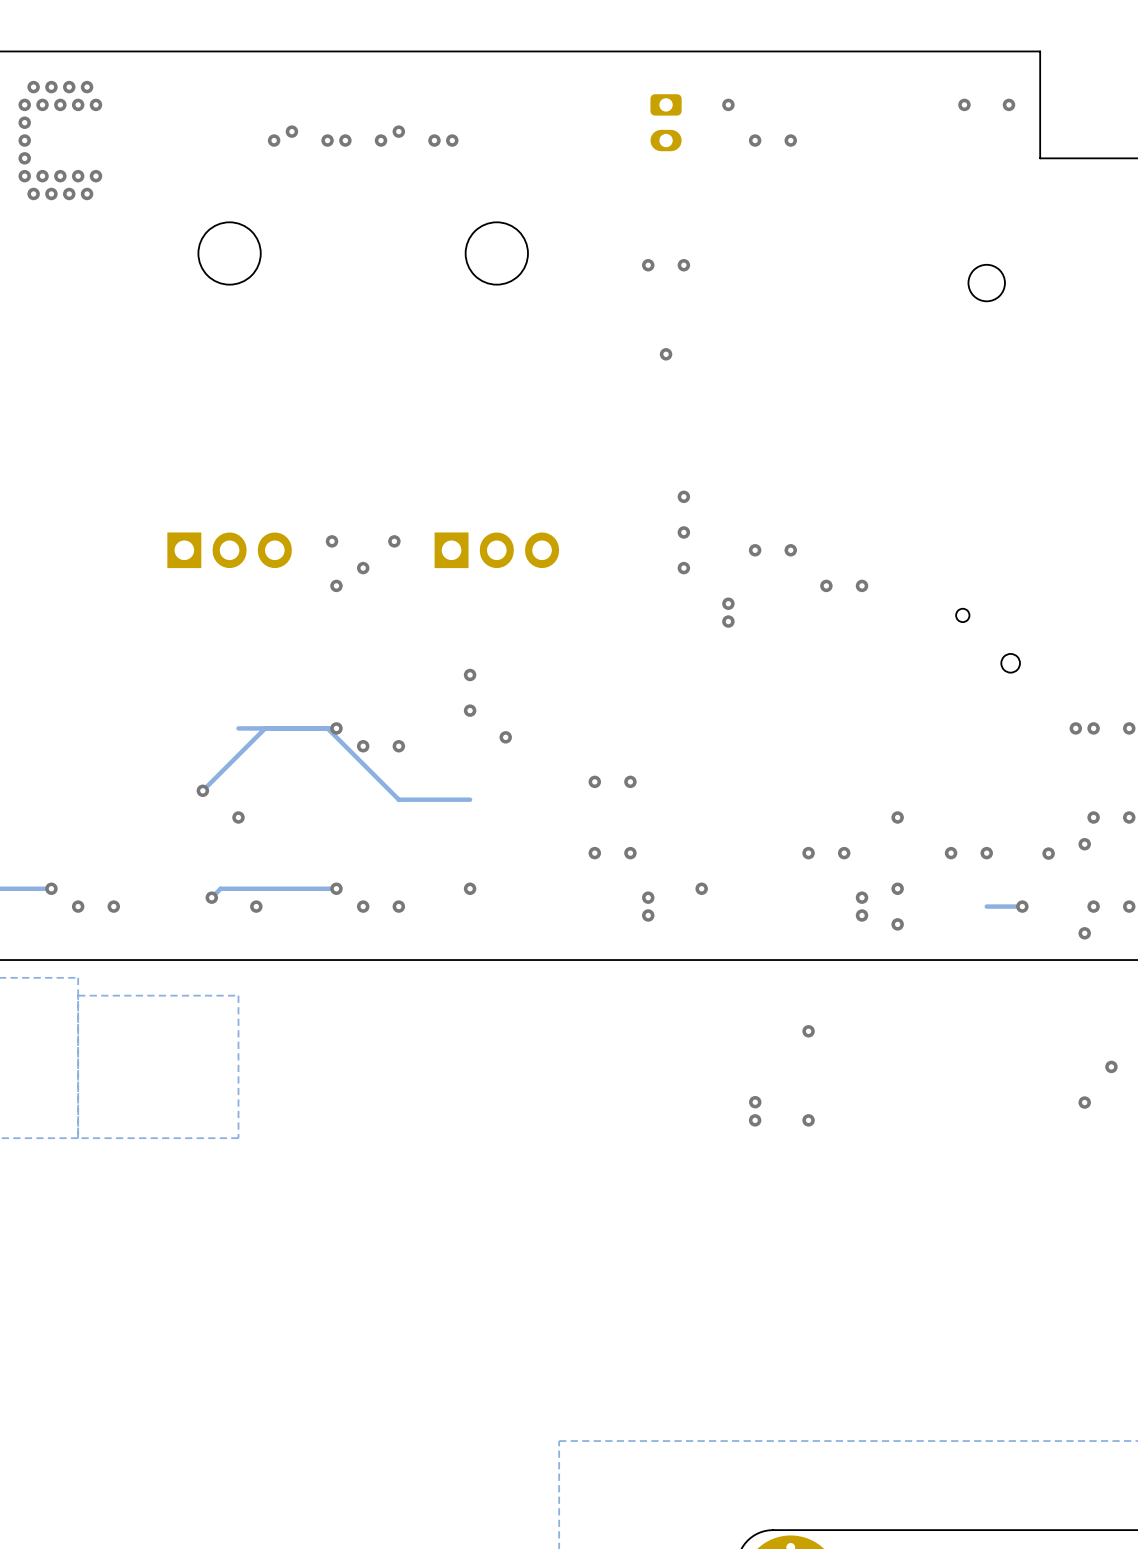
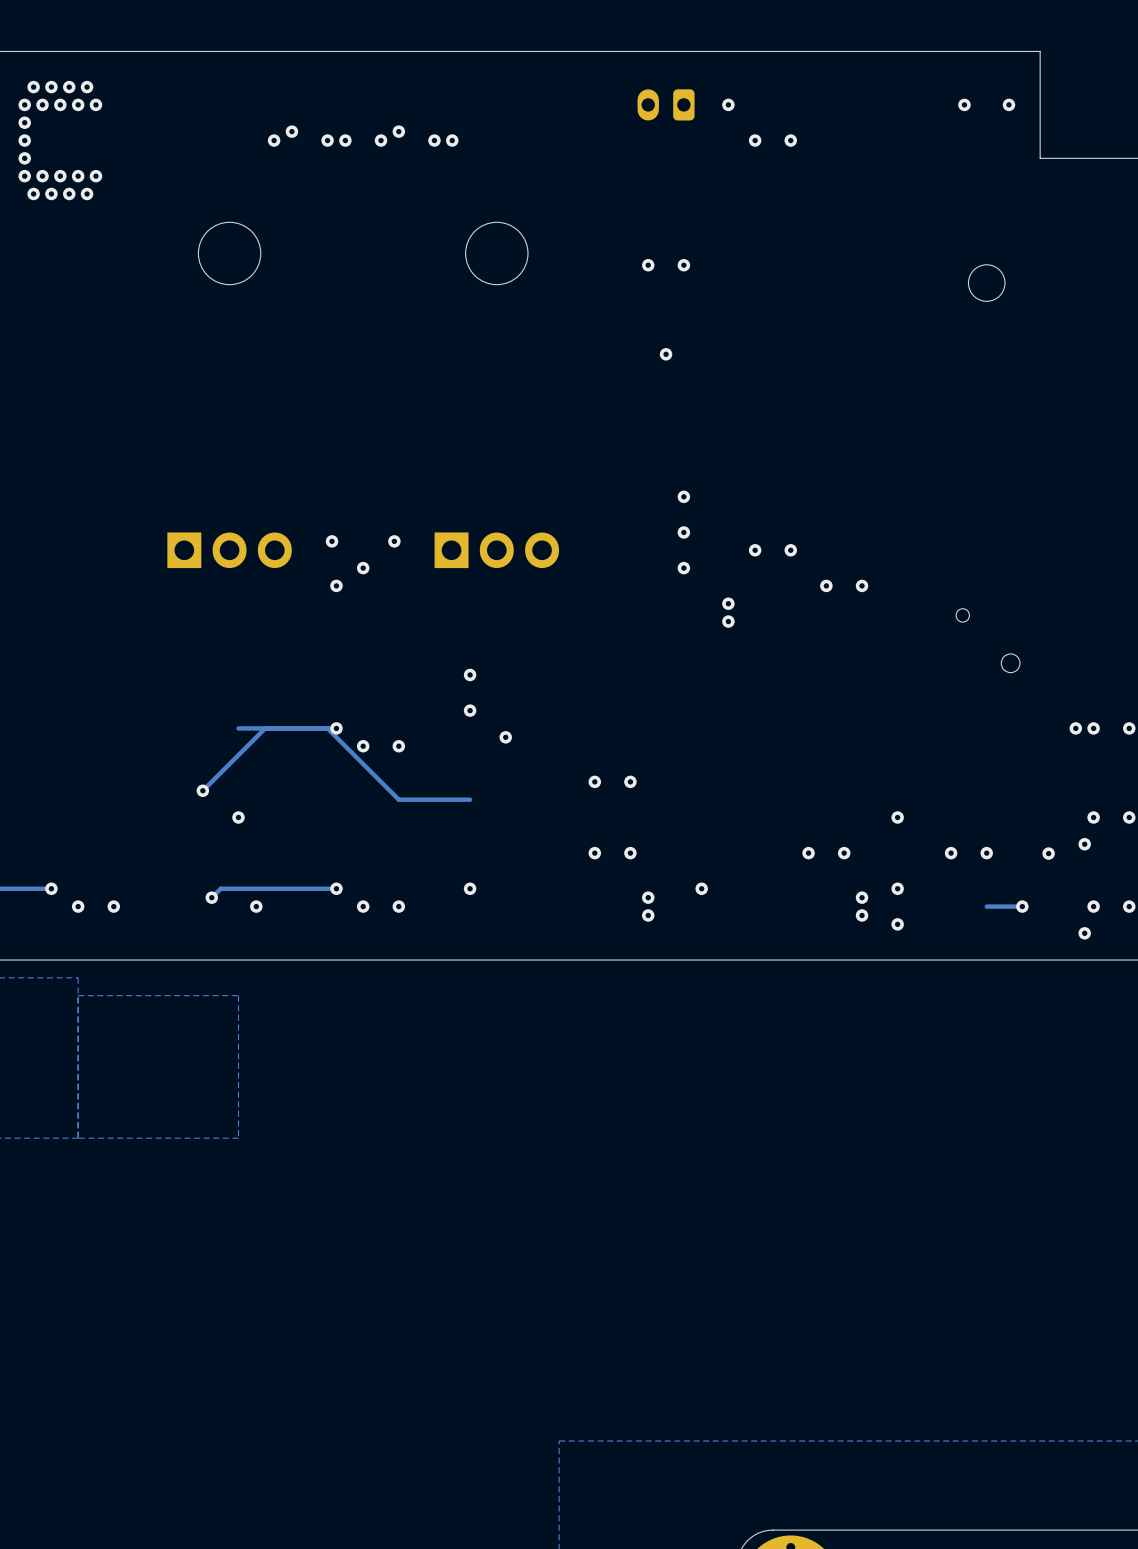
part rotation: 0° (666, 122) -> 90° clockwise (666, 104)
via: (808, 1031) -> none
via: (1111, 1066) -> none
via: (755, 1102) -> none
via: (1084, 1102) -> none
via: (755, 1120) -> none
via: (808, 1120) -> none

